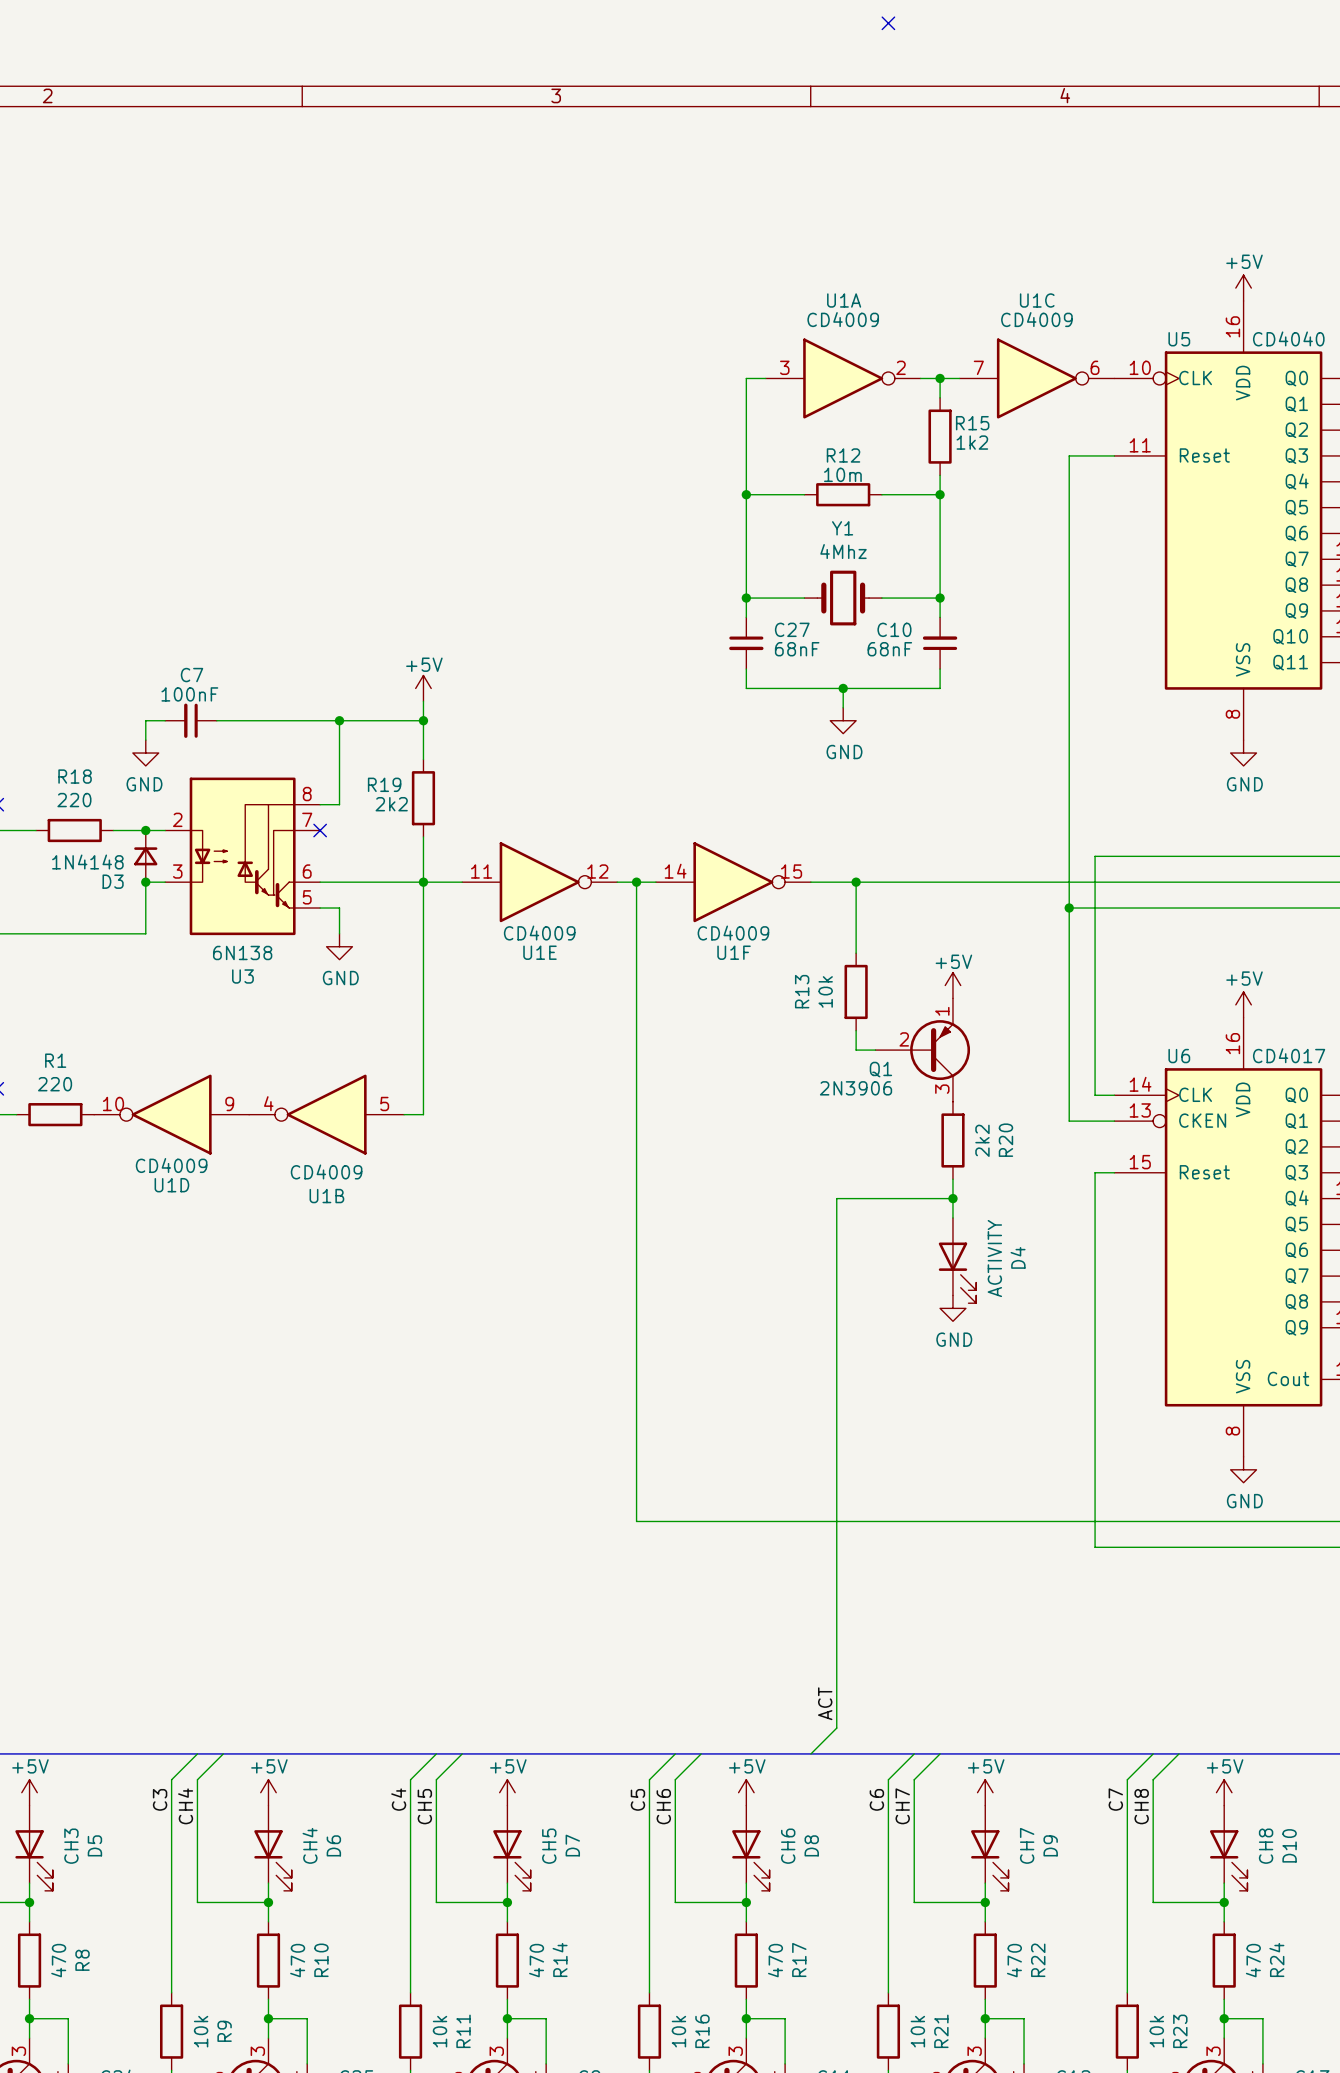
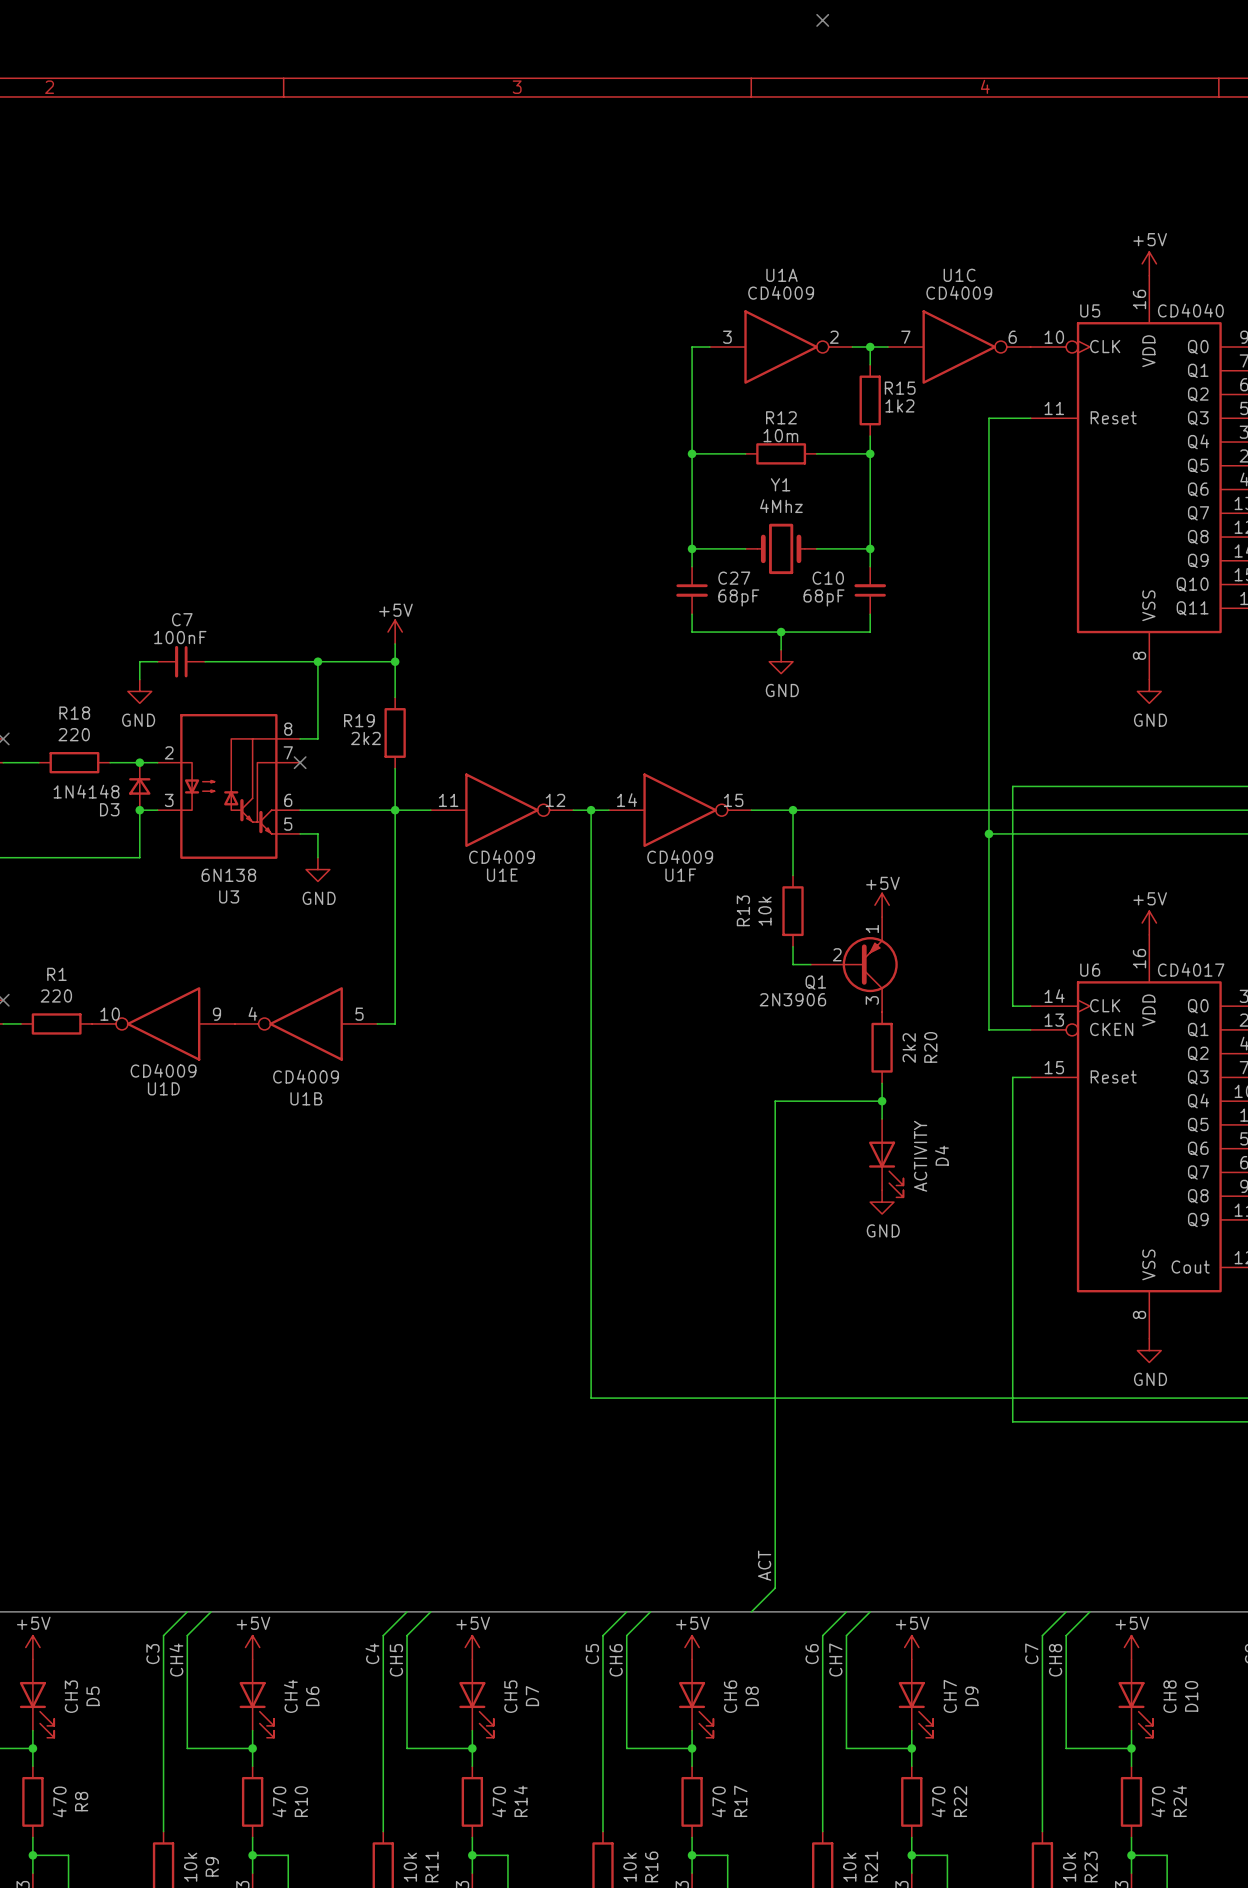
C27 value: 68nF (797, 649) -> 68pF (738, 597)
C10 value: 68nF (889, 649) -> 68pF (824, 597)

